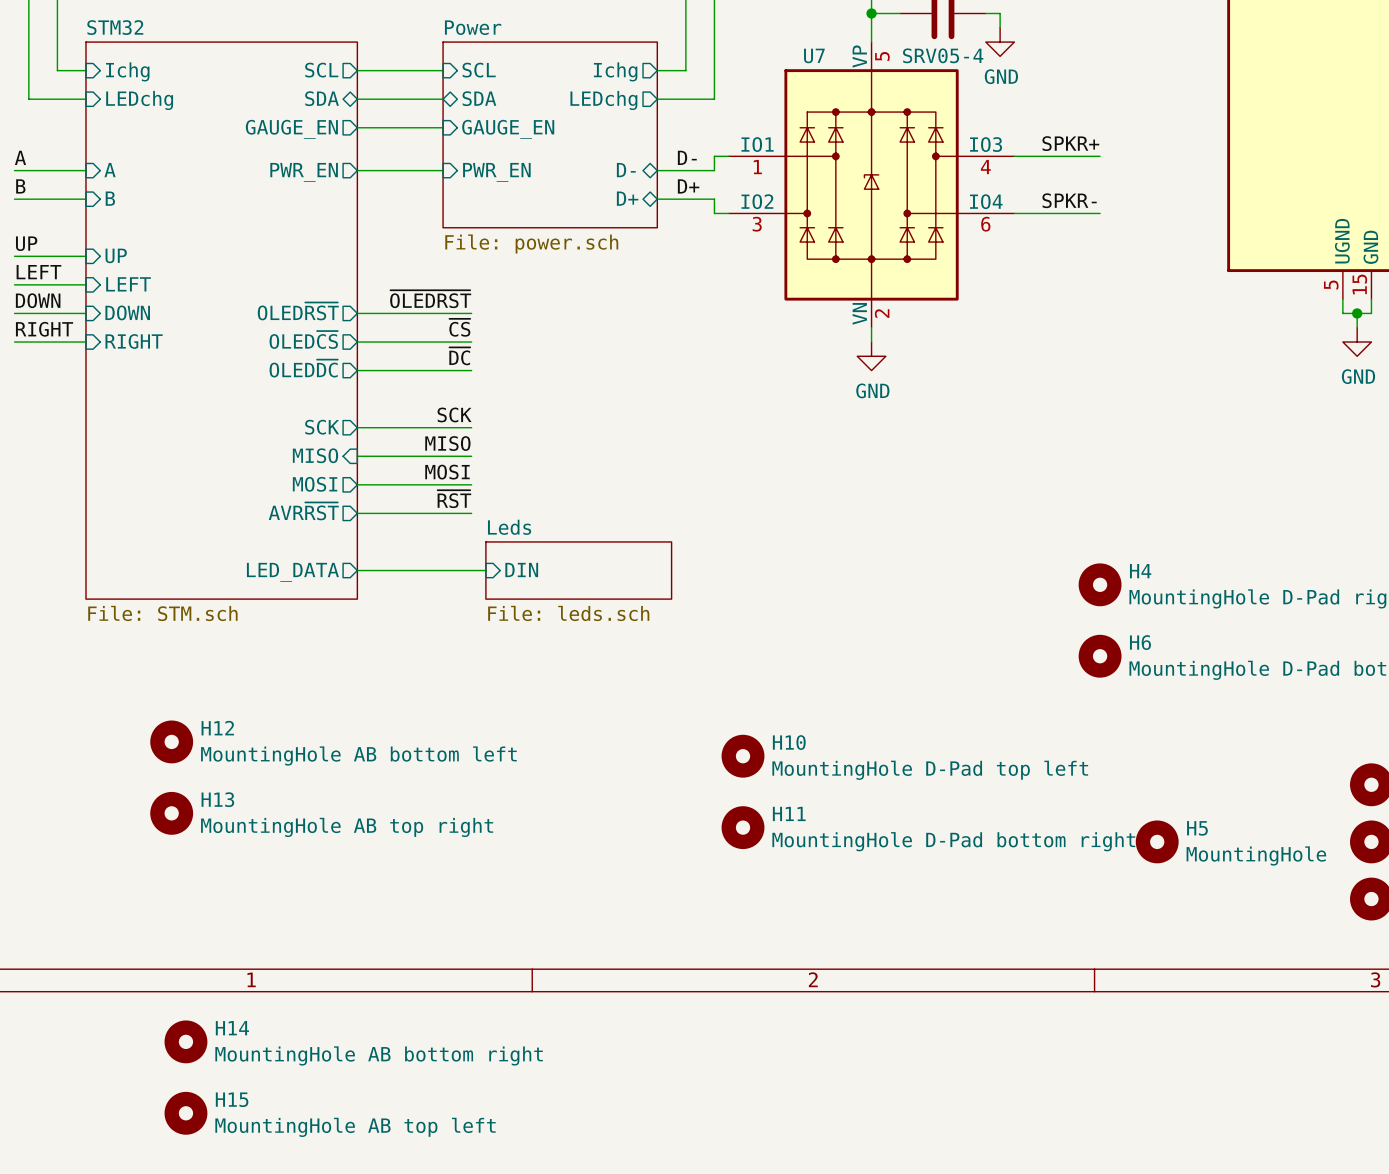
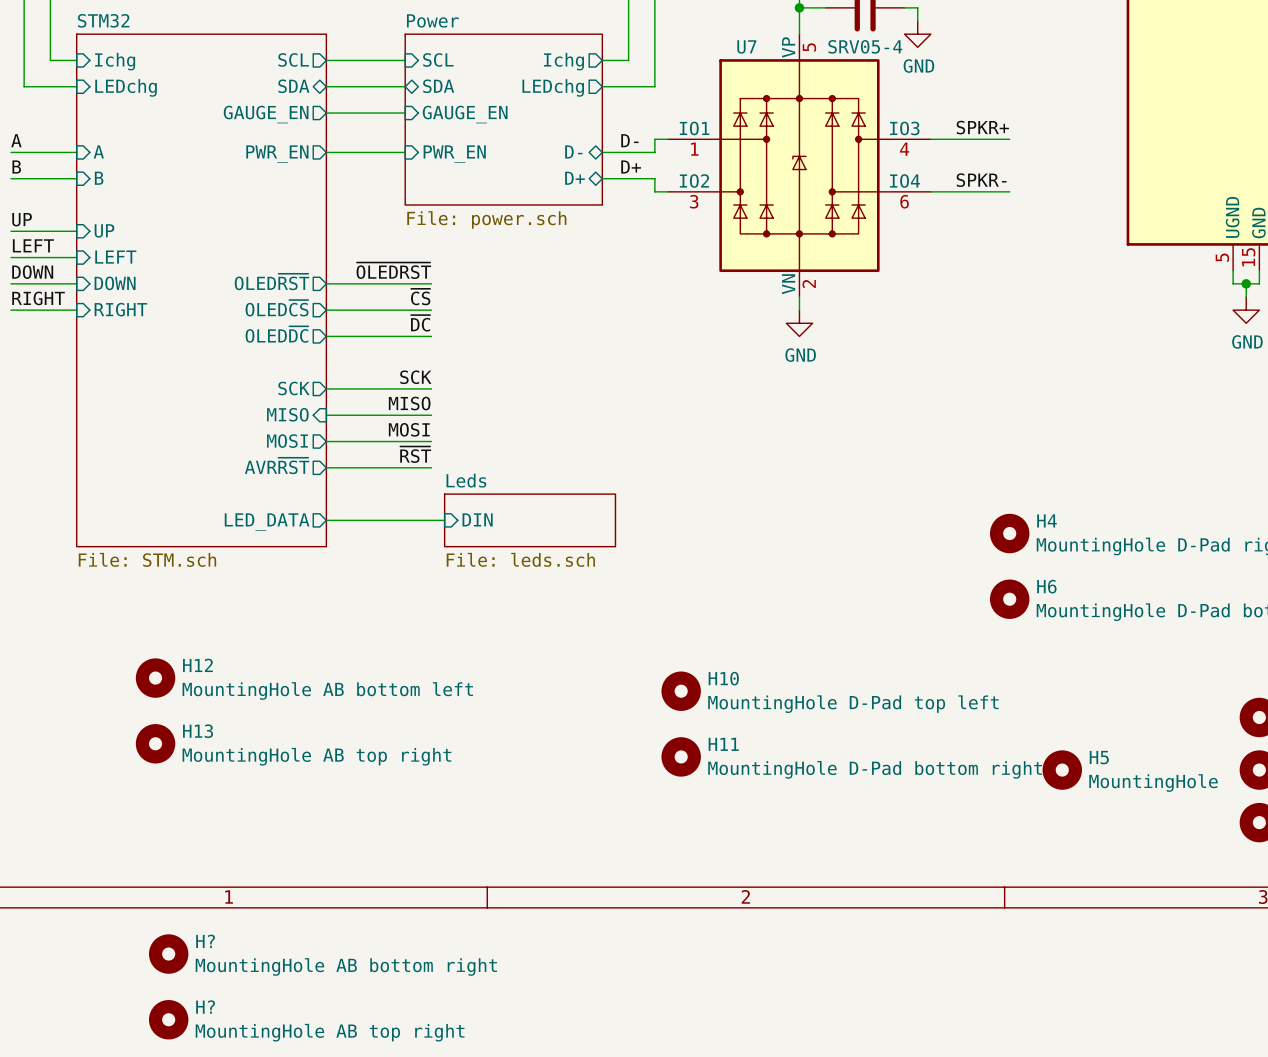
H14 name: H14 (232, 1028) -> H? (205, 941)
H15 name: H15 (232, 1099) -> H? (205, 1007)
H15 value: MountingHole AB top left (355, 1127) -> MountingHole AB top right (330, 1032)

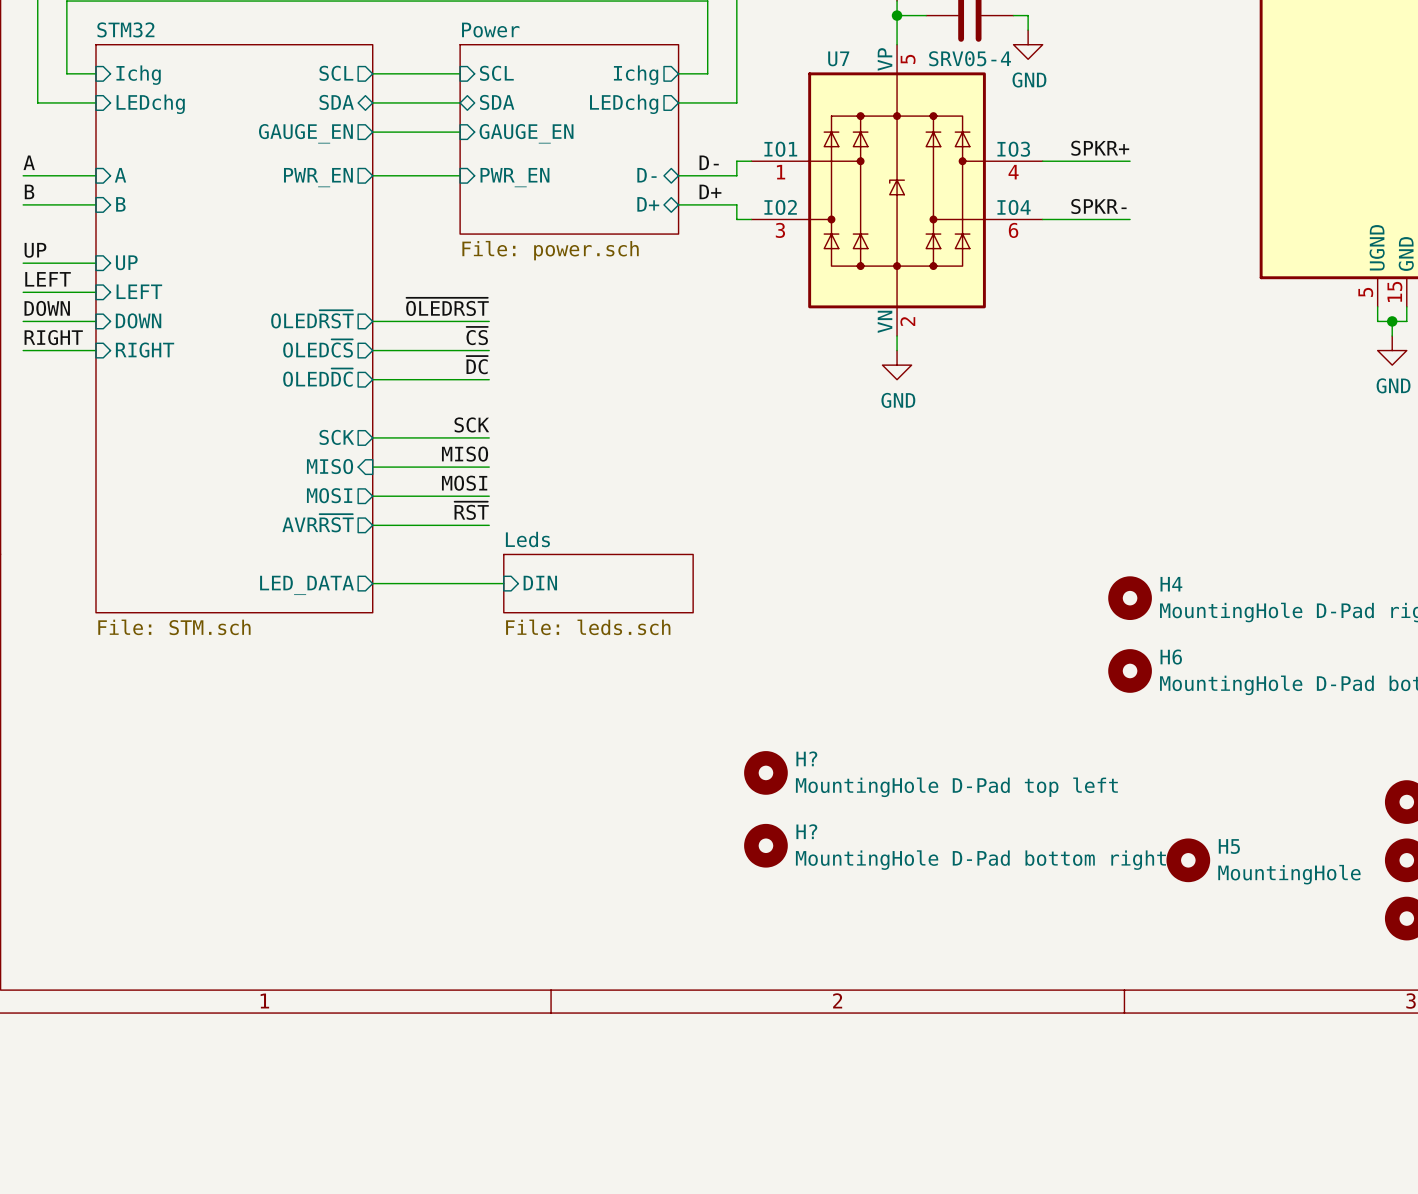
H12: MountingHole AB bottom left (155, 678) -> none
H10 name: H10 (723, 678) -> H? (806, 758)
H13: MountingHole AB top right (155, 743) -> none
H11 name: H11 (723, 744) -> H? (806, 831)
H?: MountingHole AB bottom right (168, 954) -> none
H?: MountingHole AB top right (168, 1019) -> none

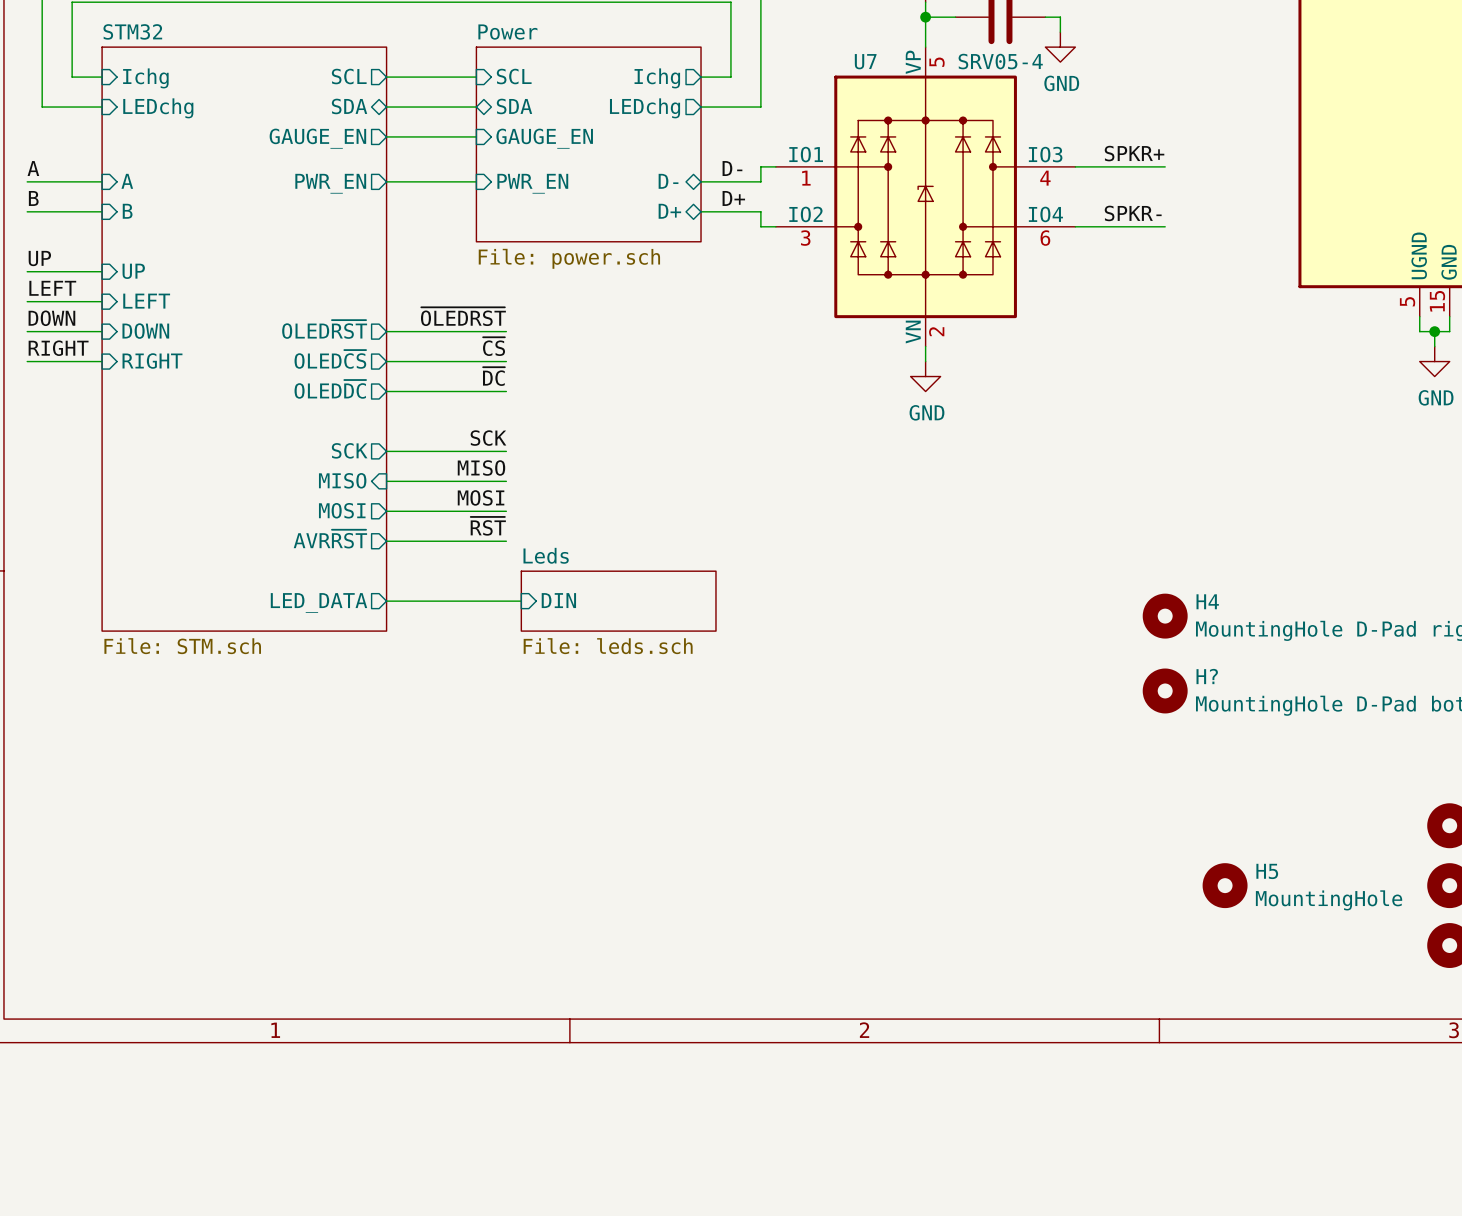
H6 name: H6 (1171, 657) -> H? (1207, 676)
H?: MountingHole D-Pad top left (765, 772) -> none
H?: MountingHole D-Pad bottom right (765, 845) -> none

